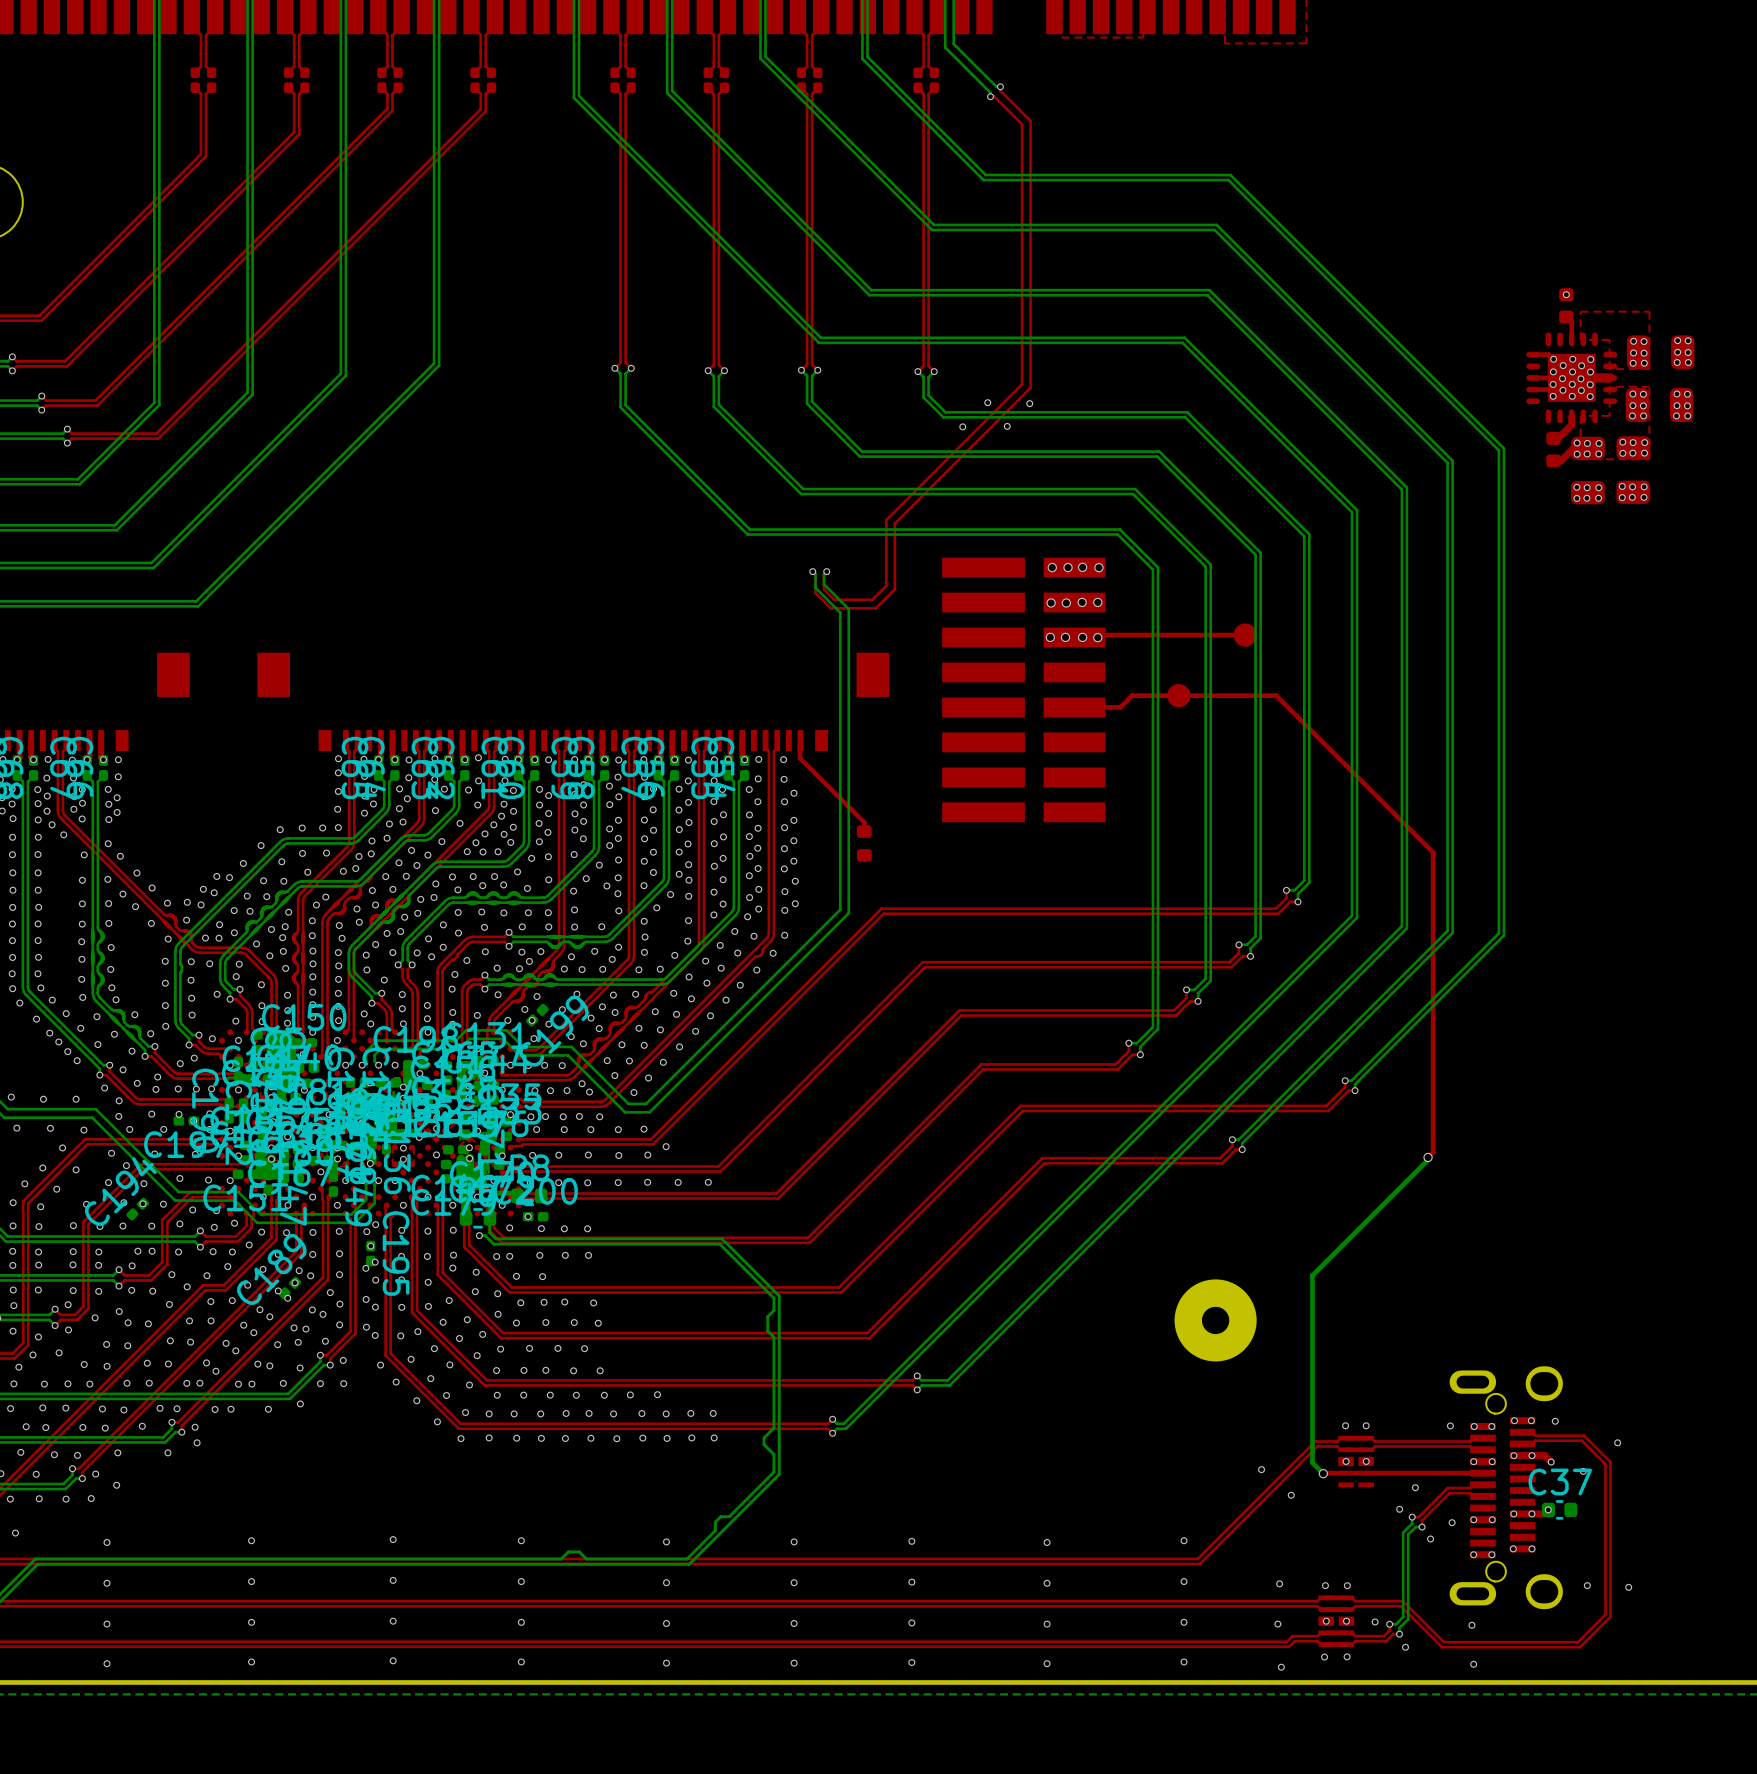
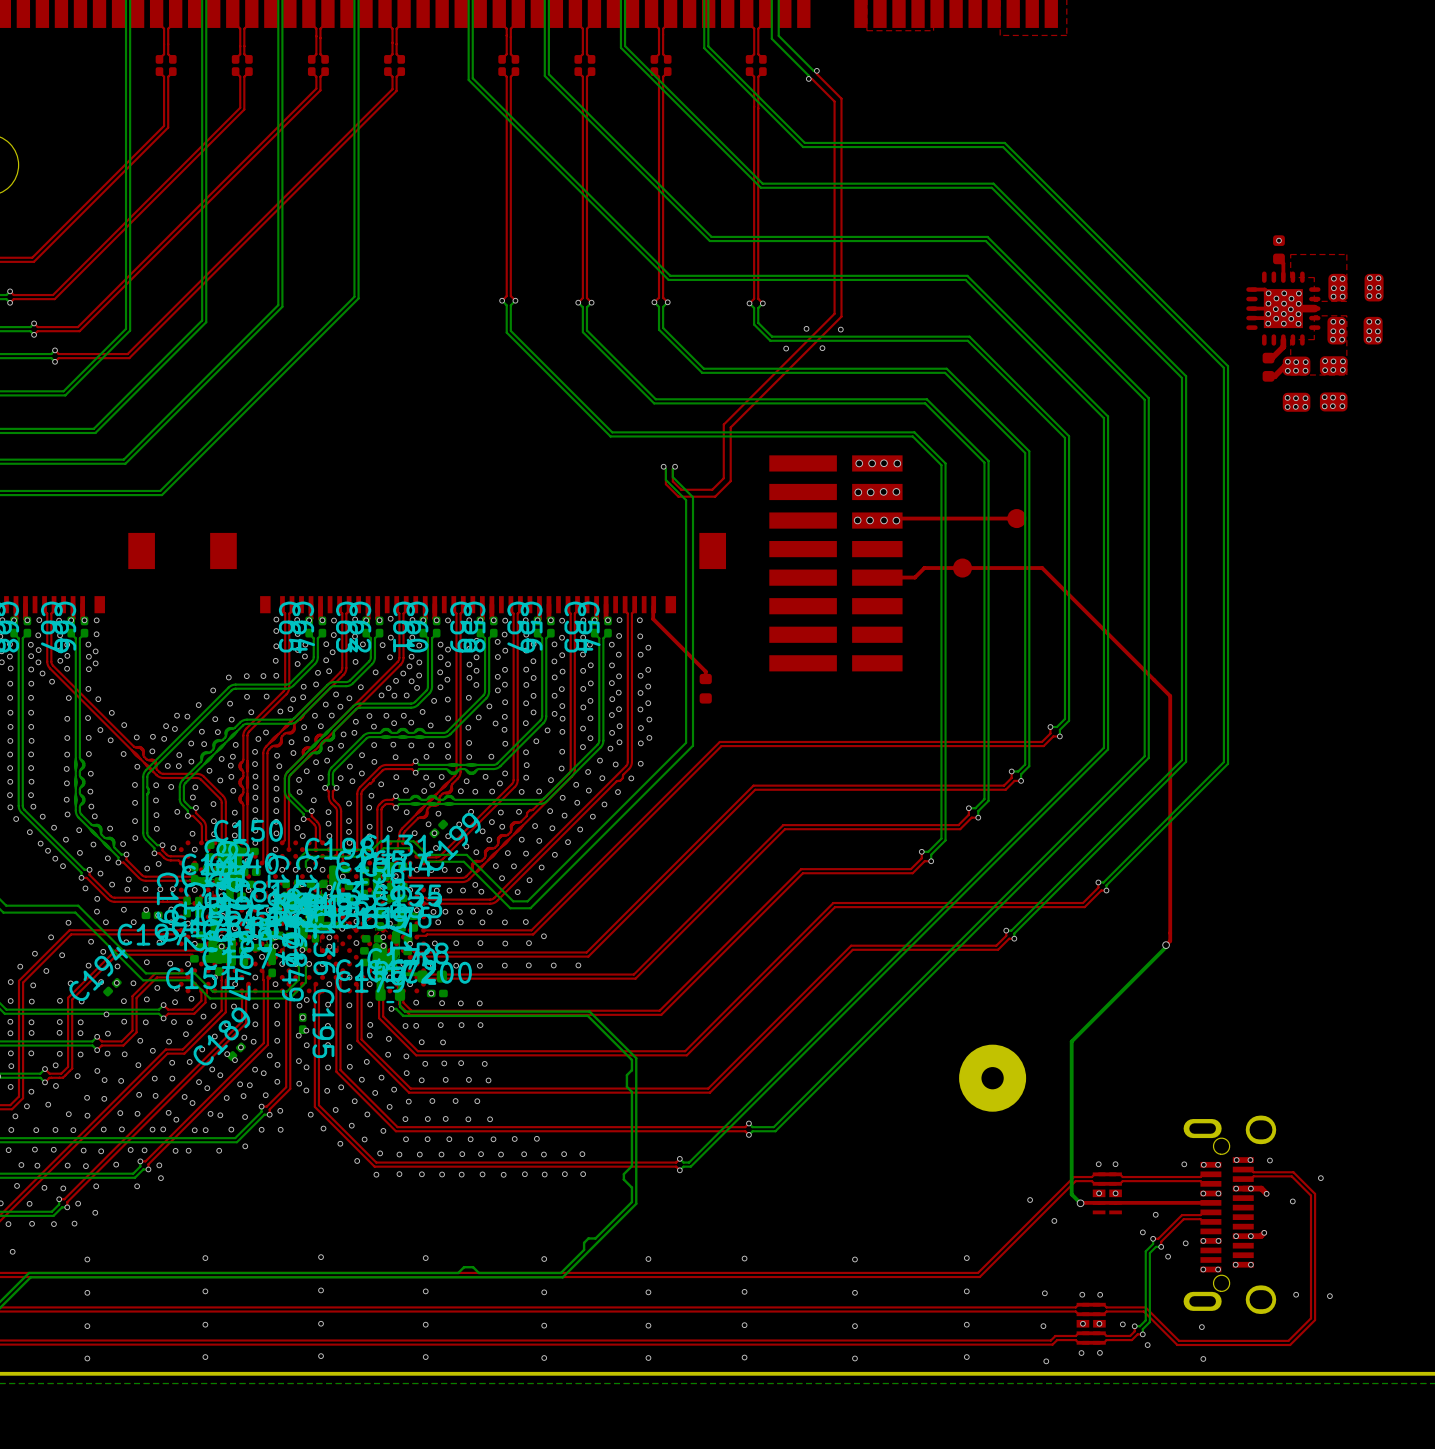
via: (11, 1097) -> none
via: (43, 1099) -> none
via: (76, 1099) -> none
via: (16, 1128) -> none
via: (50, 1128) -> none
via: (122, 1226) -> none
via: none -> (106, 1014)
via: (137, 1251) -> none
C37: (1559, 1509) -> none

